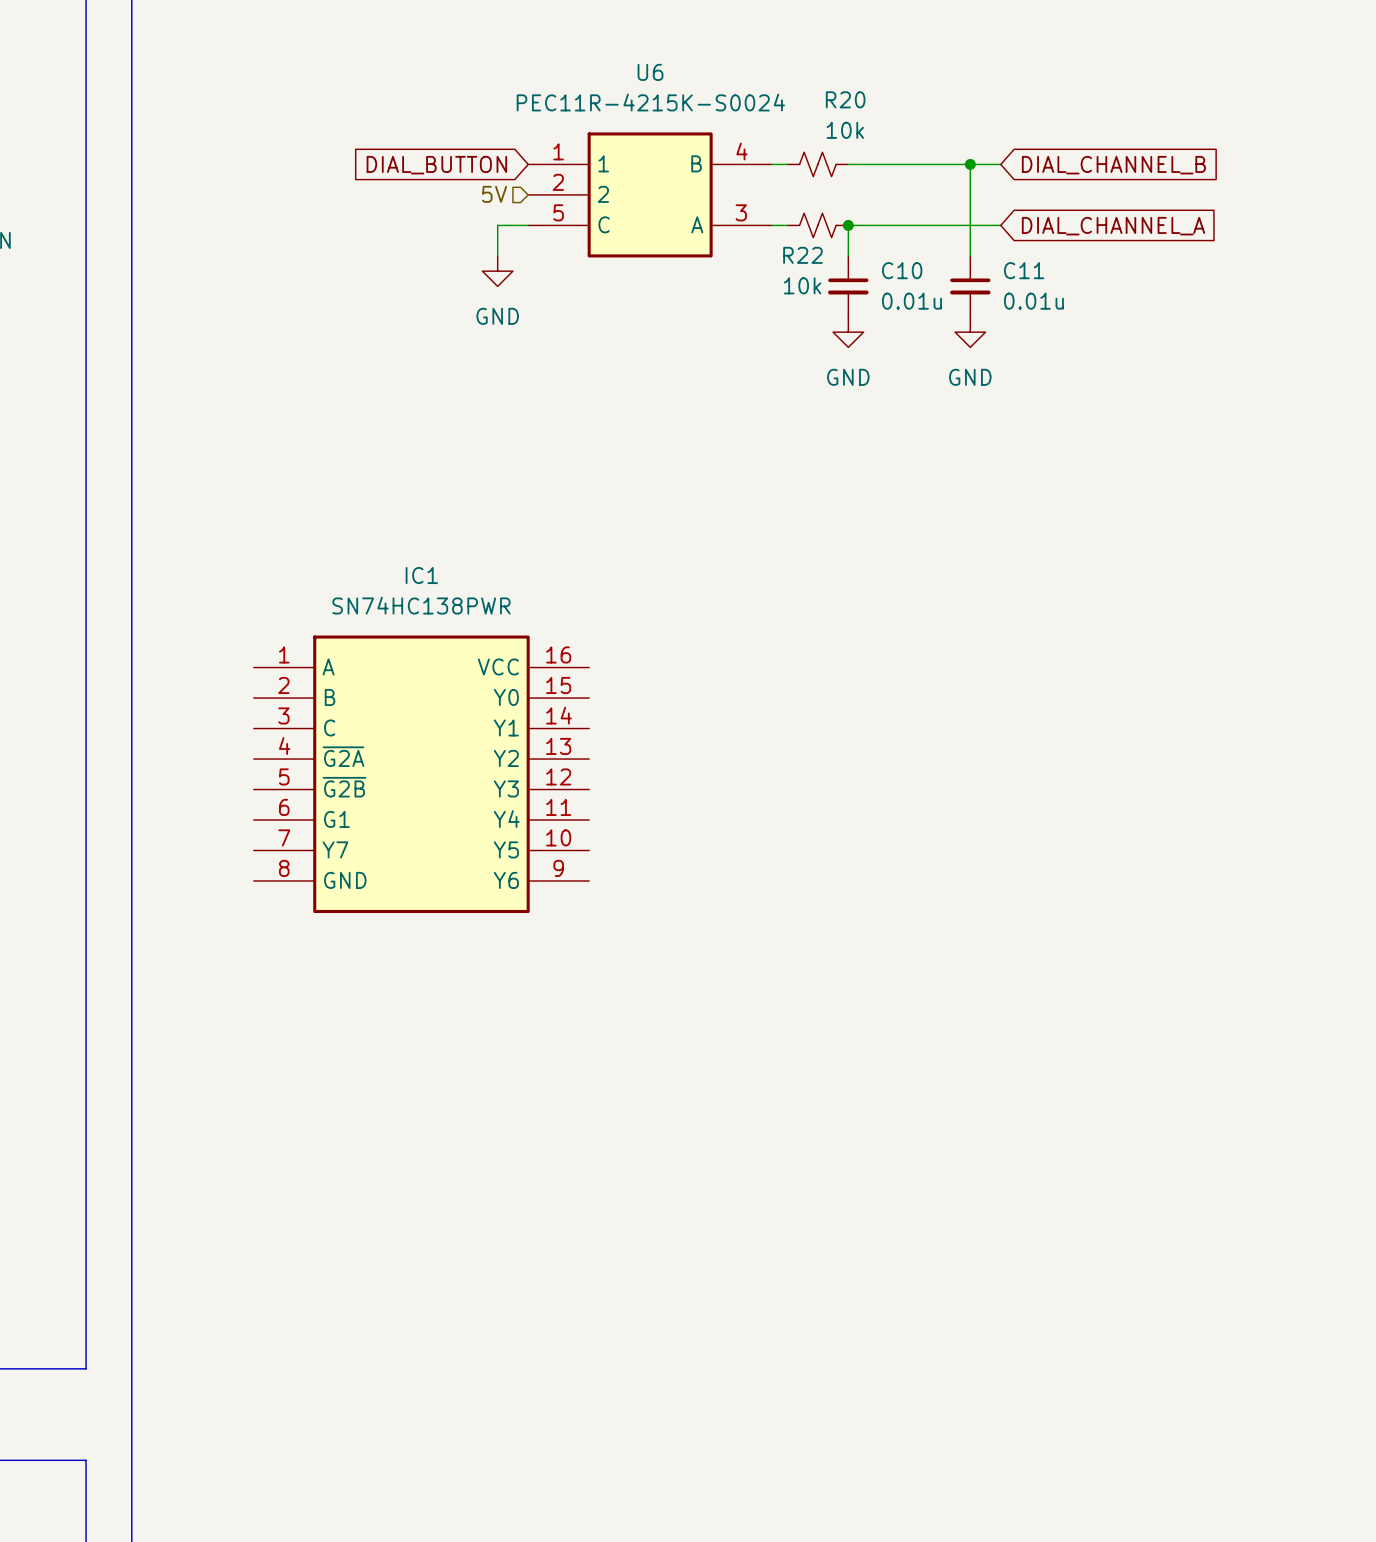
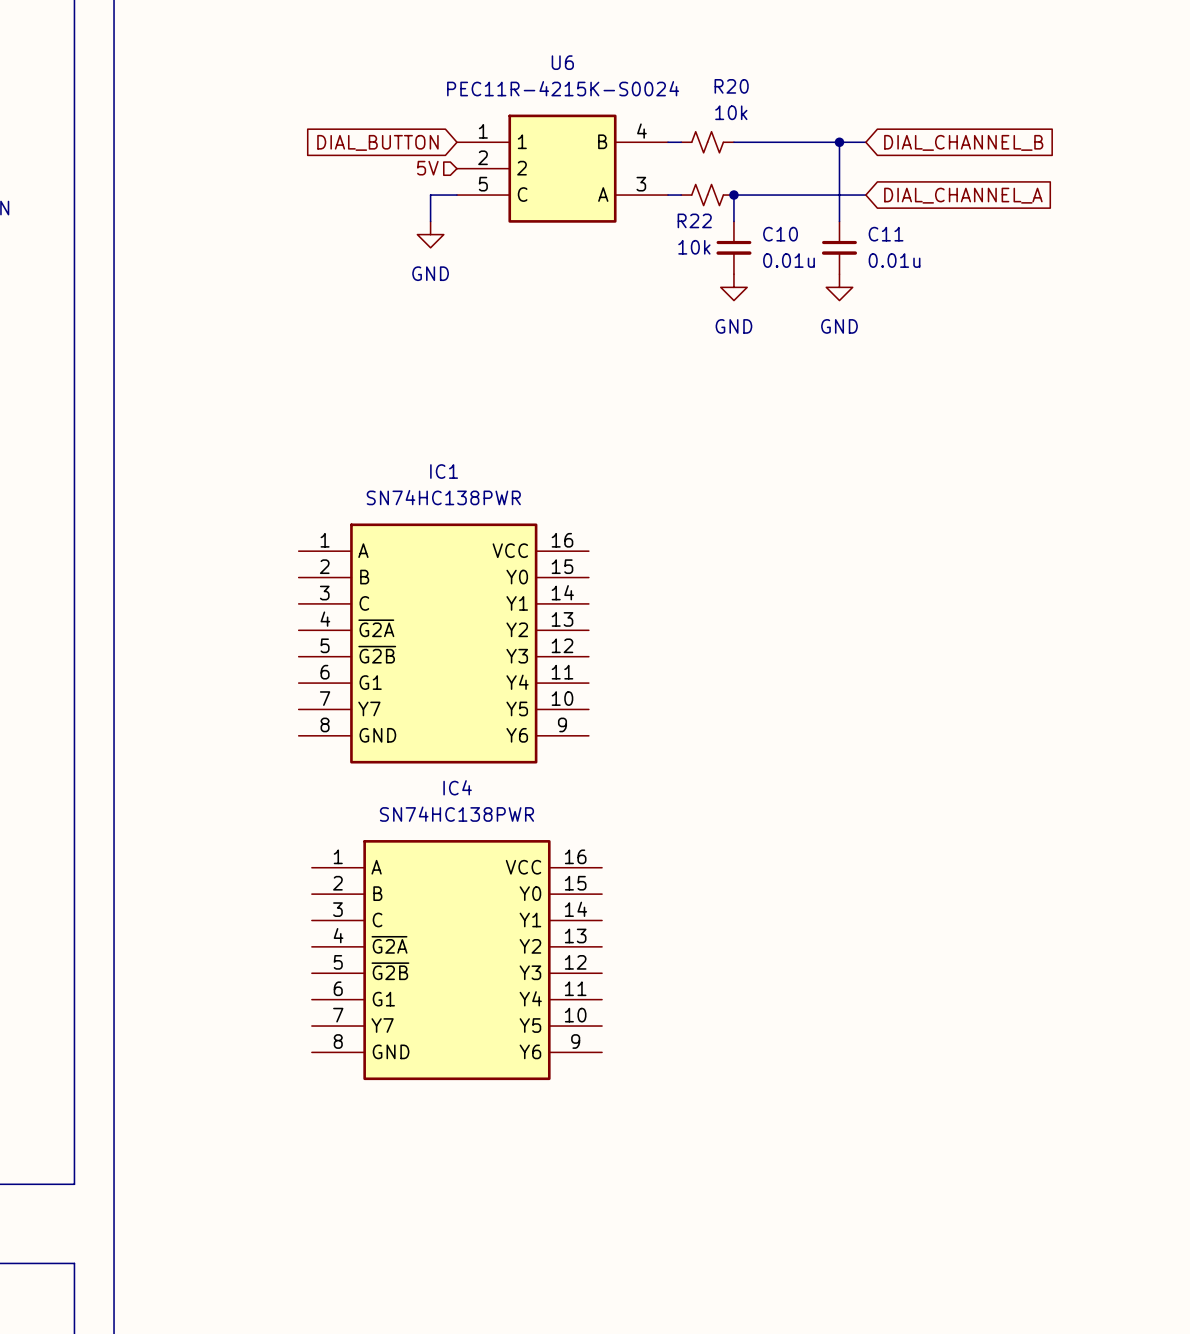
IC1 position: (421, 774) -> (443, 643)
IC4: none -> SN74HC138PWR (456, 960)

